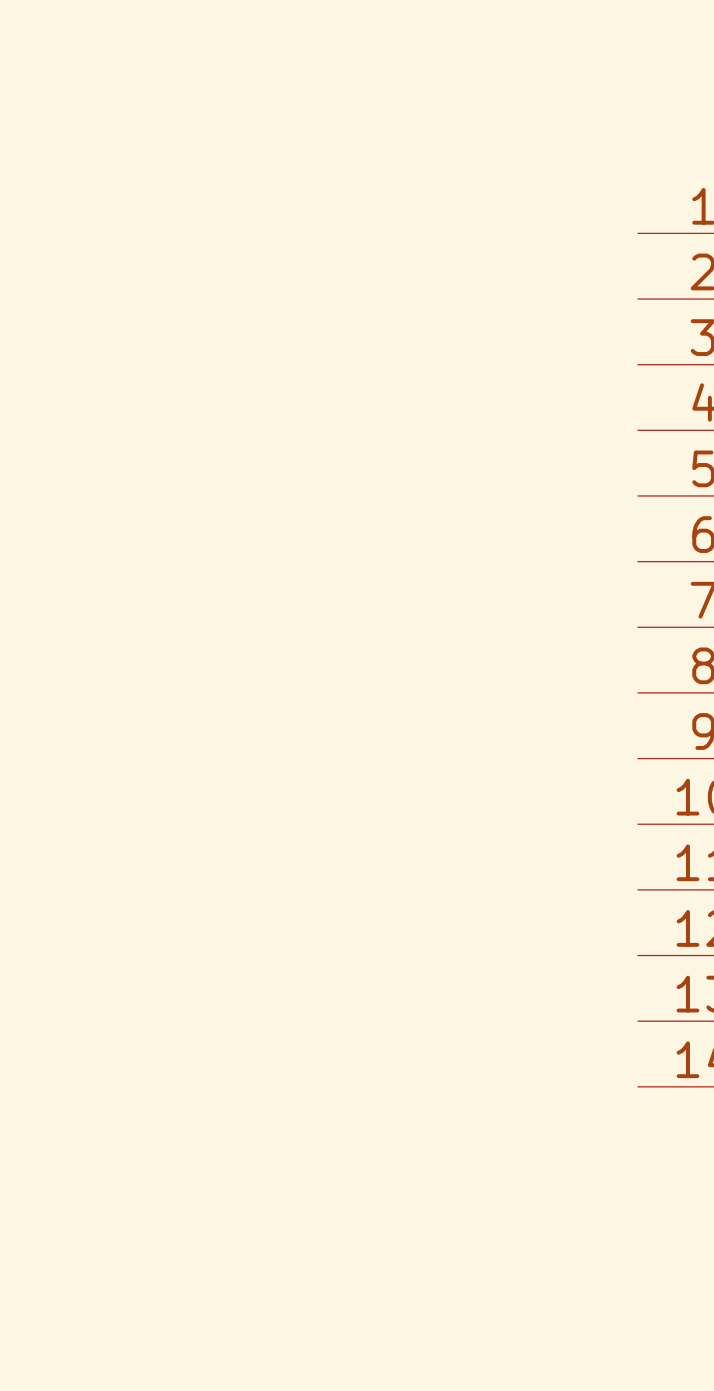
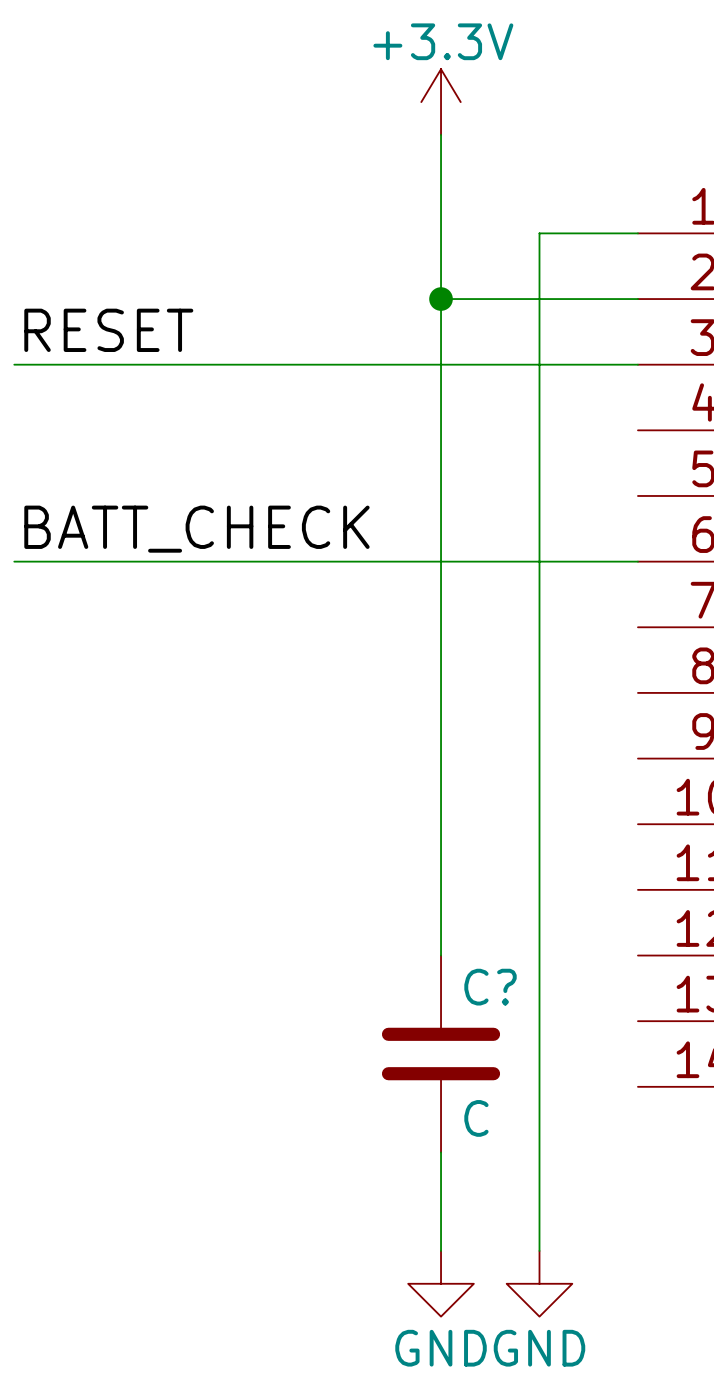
power symbol: none -> +3.3V (441, 102)
wire: none -> (441, 134) (441, 955)
wire: none -> (637, 233) (539, 233) (539, 1250)
wire: none -> (441, 299) (637, 299)
junction: none -> (441, 299)
label: none -> RESET (108, 330)
wire: none -> (14, 364) (637, 364)
label: none -> BATT_CHECK (196, 529)
wire: none -> (14, 561) (637, 561)
C?: none -> C (441, 1054)
wire: none -> (441, 1152) (441, 1250)
power symbol: none -> GND (441, 1283)
power symbol: none -> GND (539, 1283)

